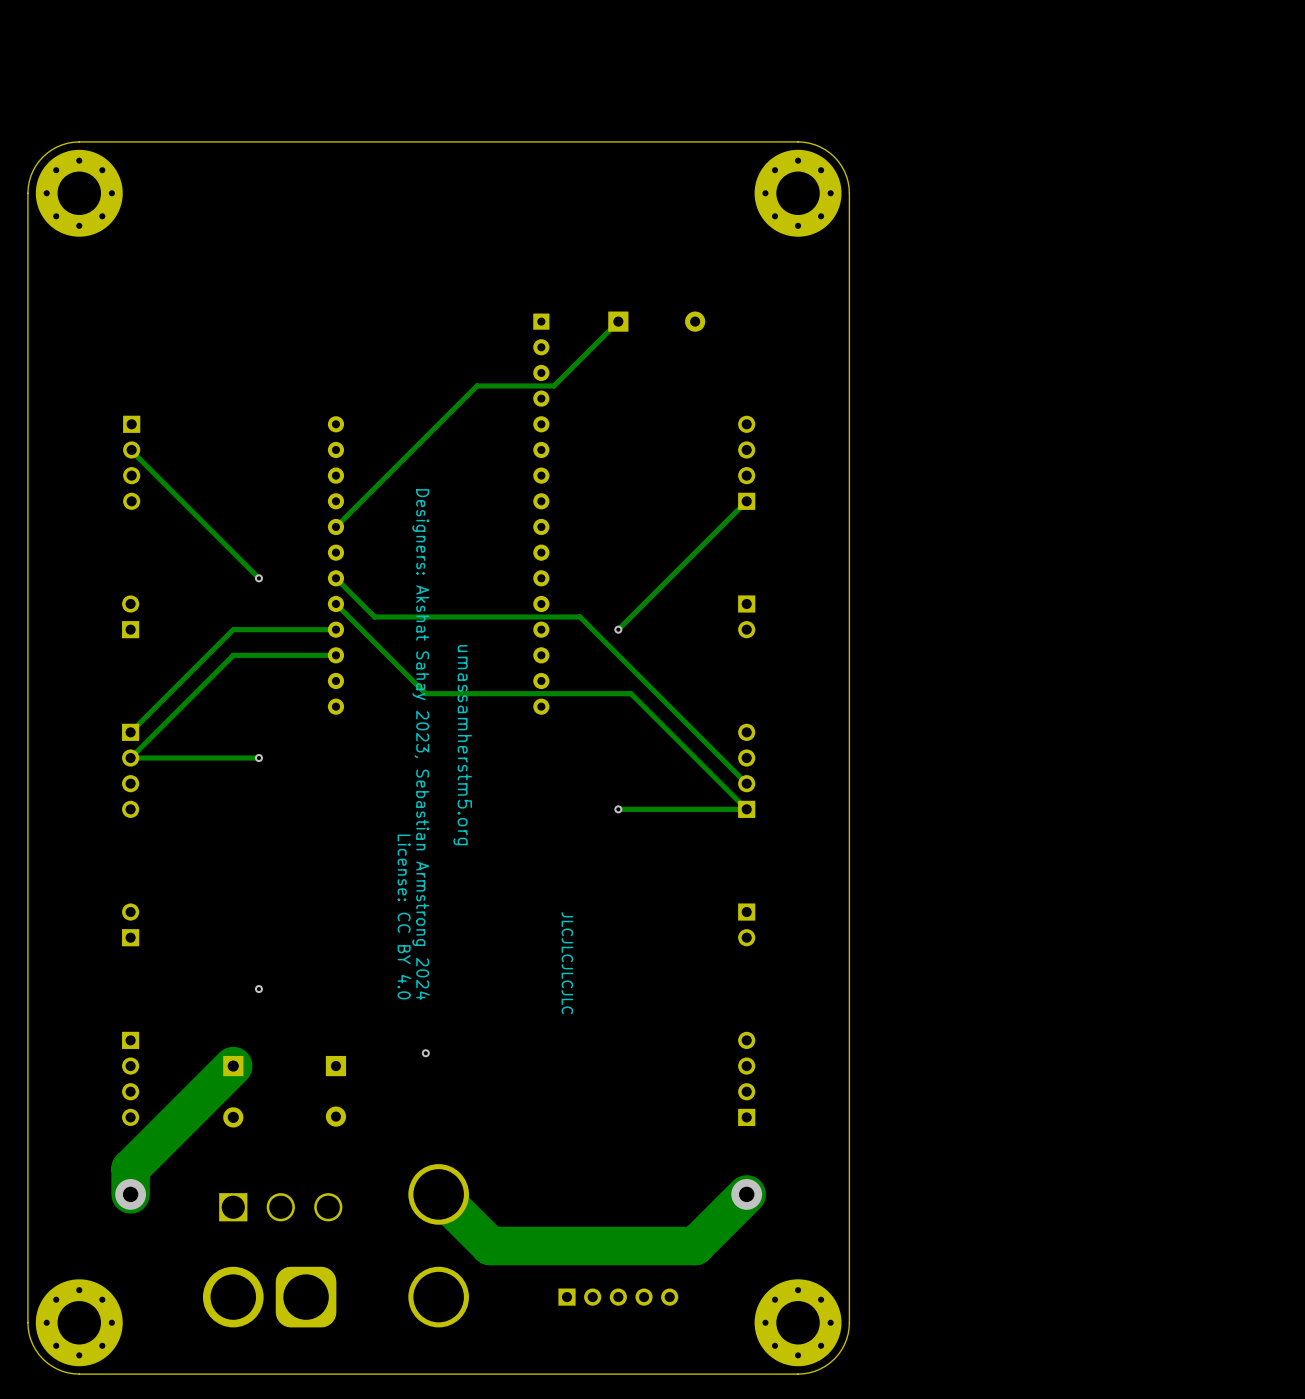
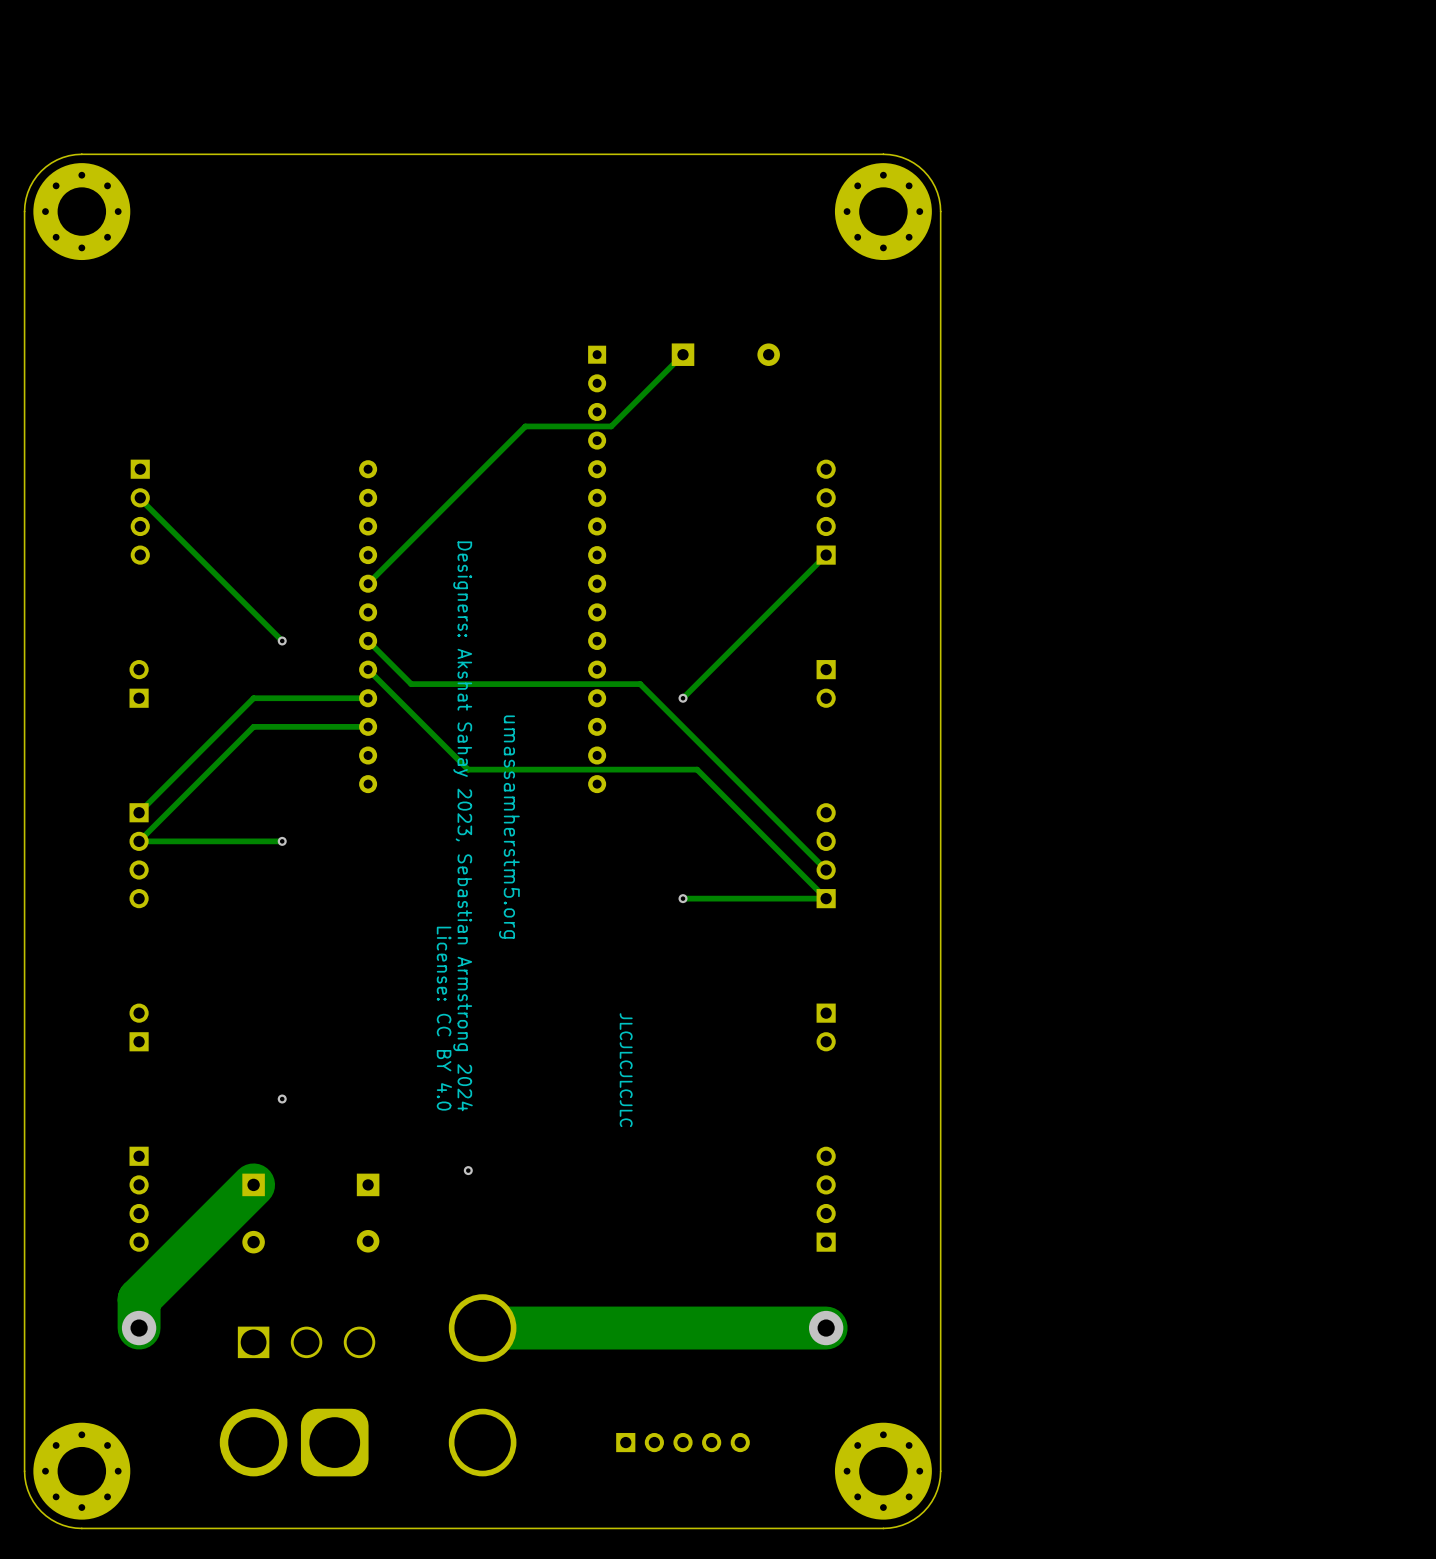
track: (746, 1194) (695, 1246) (490, 1246) (438, 1194) -> (826, 1328) (482, 1328)

